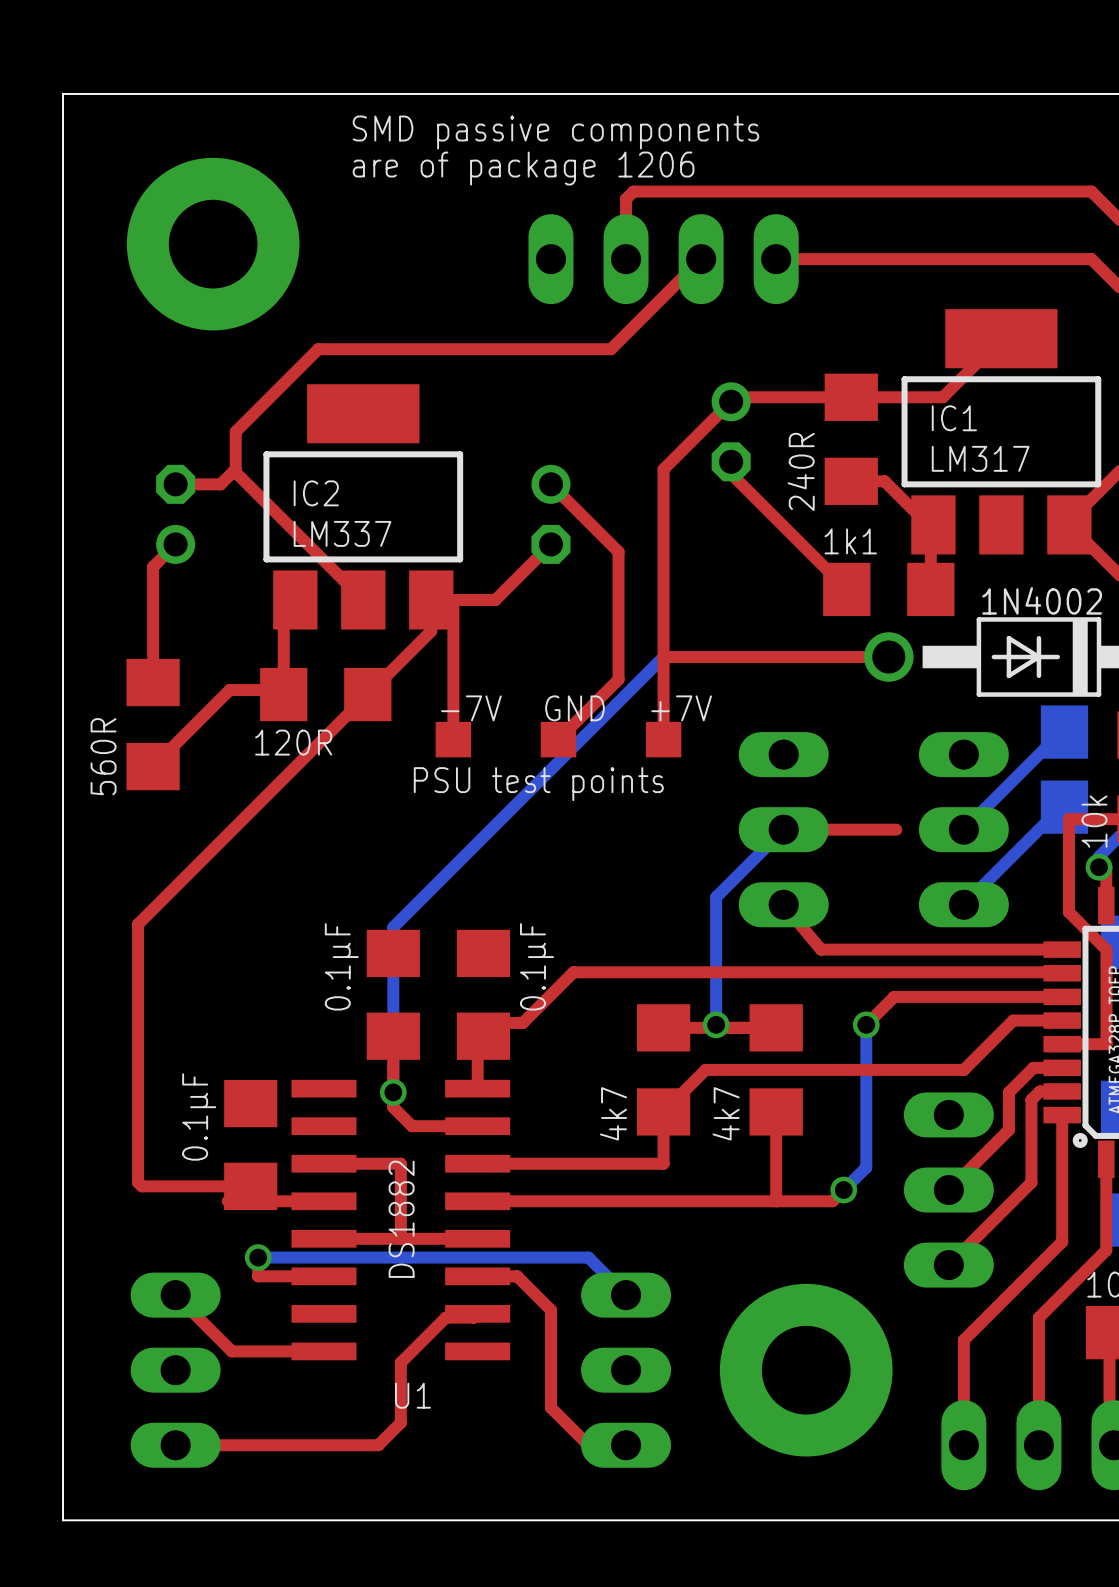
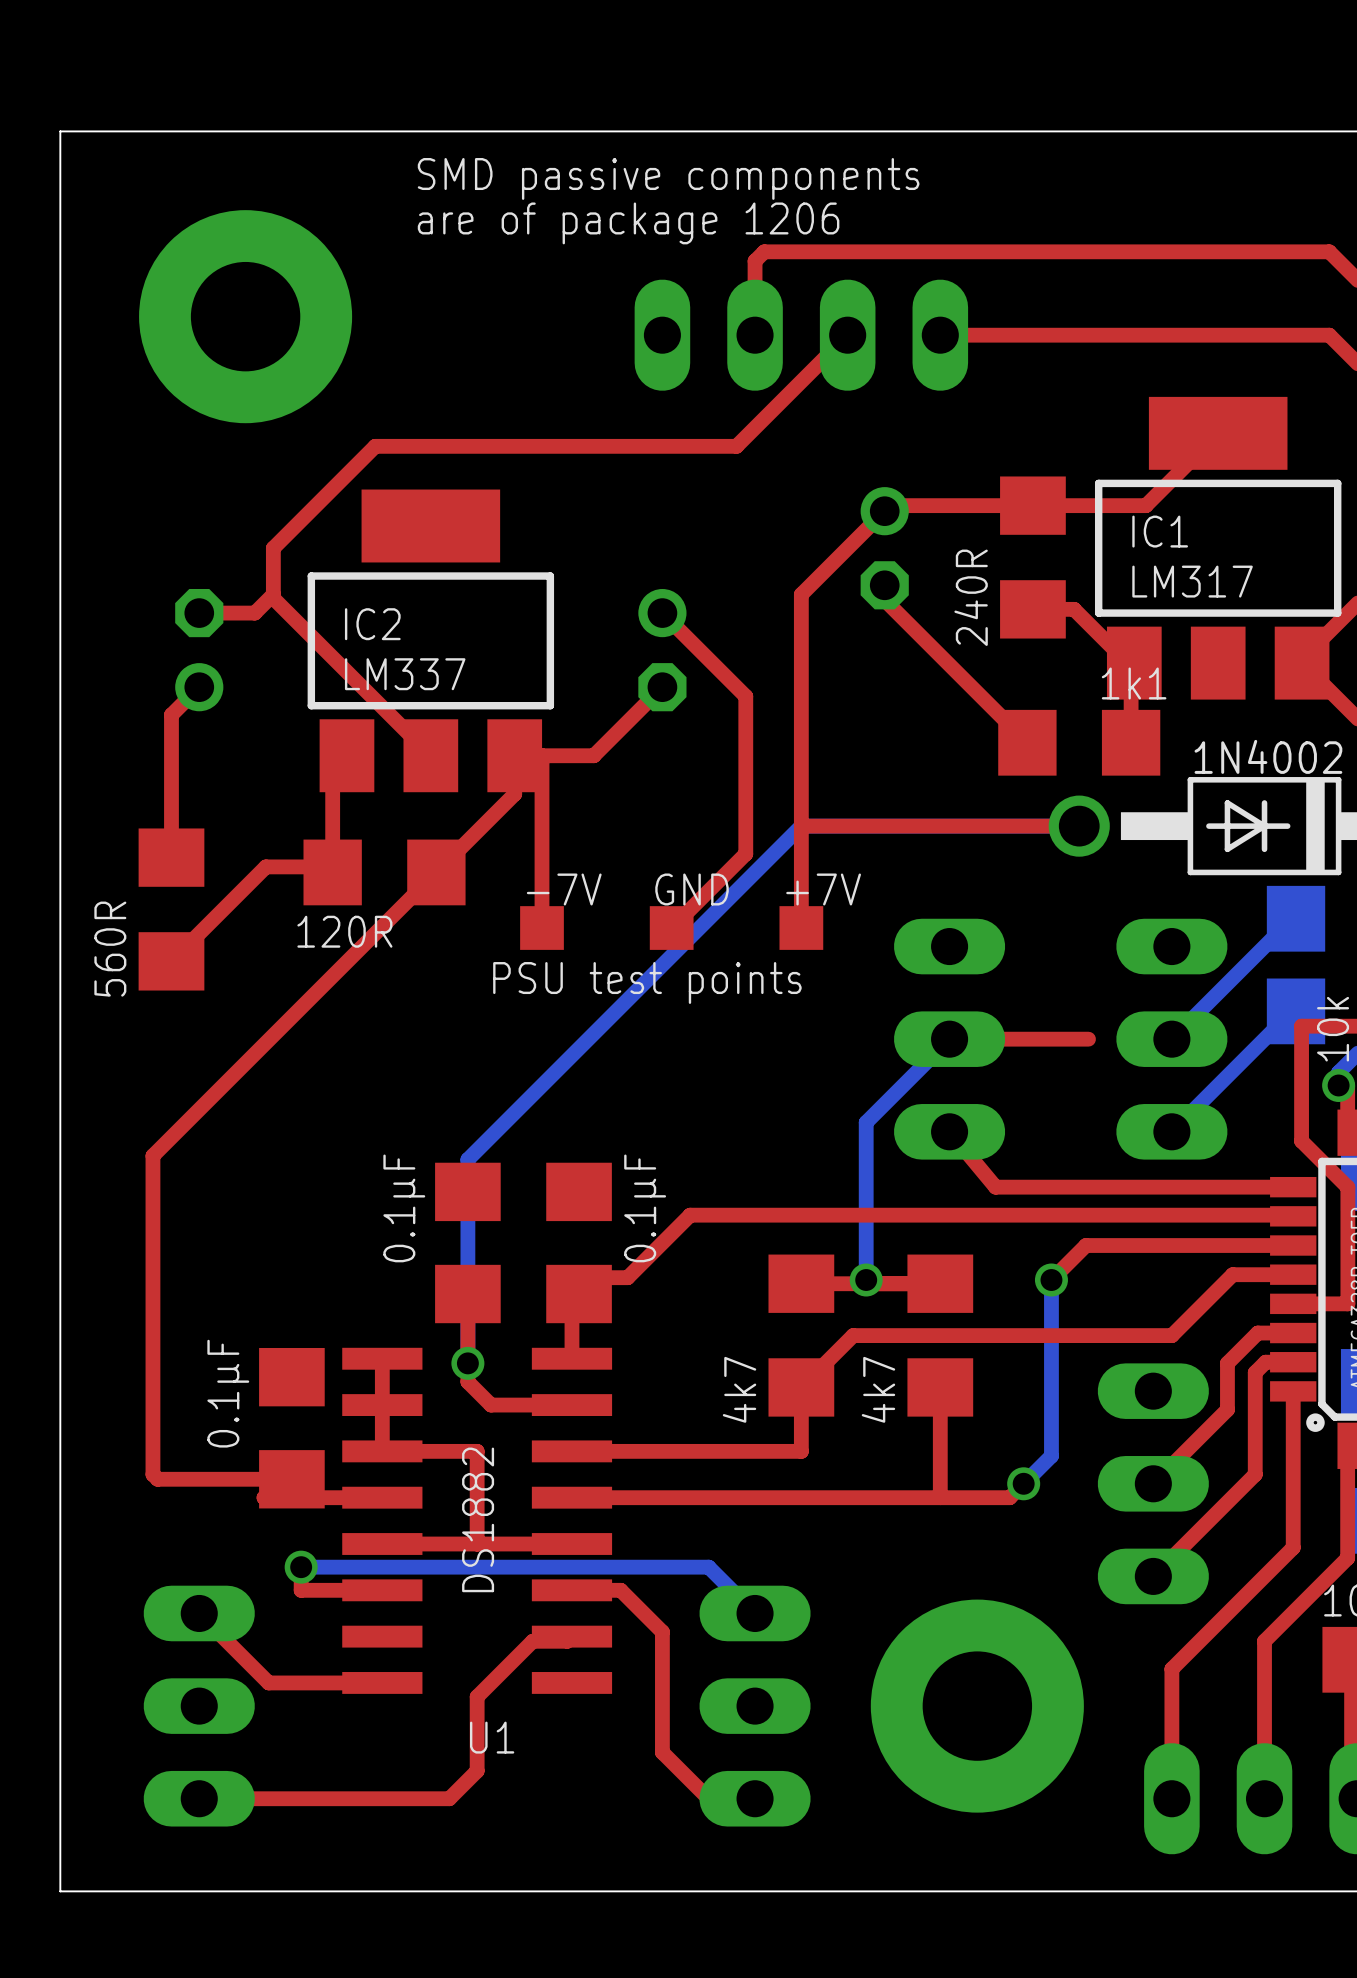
part value position: 1k1 (850, 541) -> 1k1 (1134, 683)
top track: none -> (382, 1358) (382, 1451)

